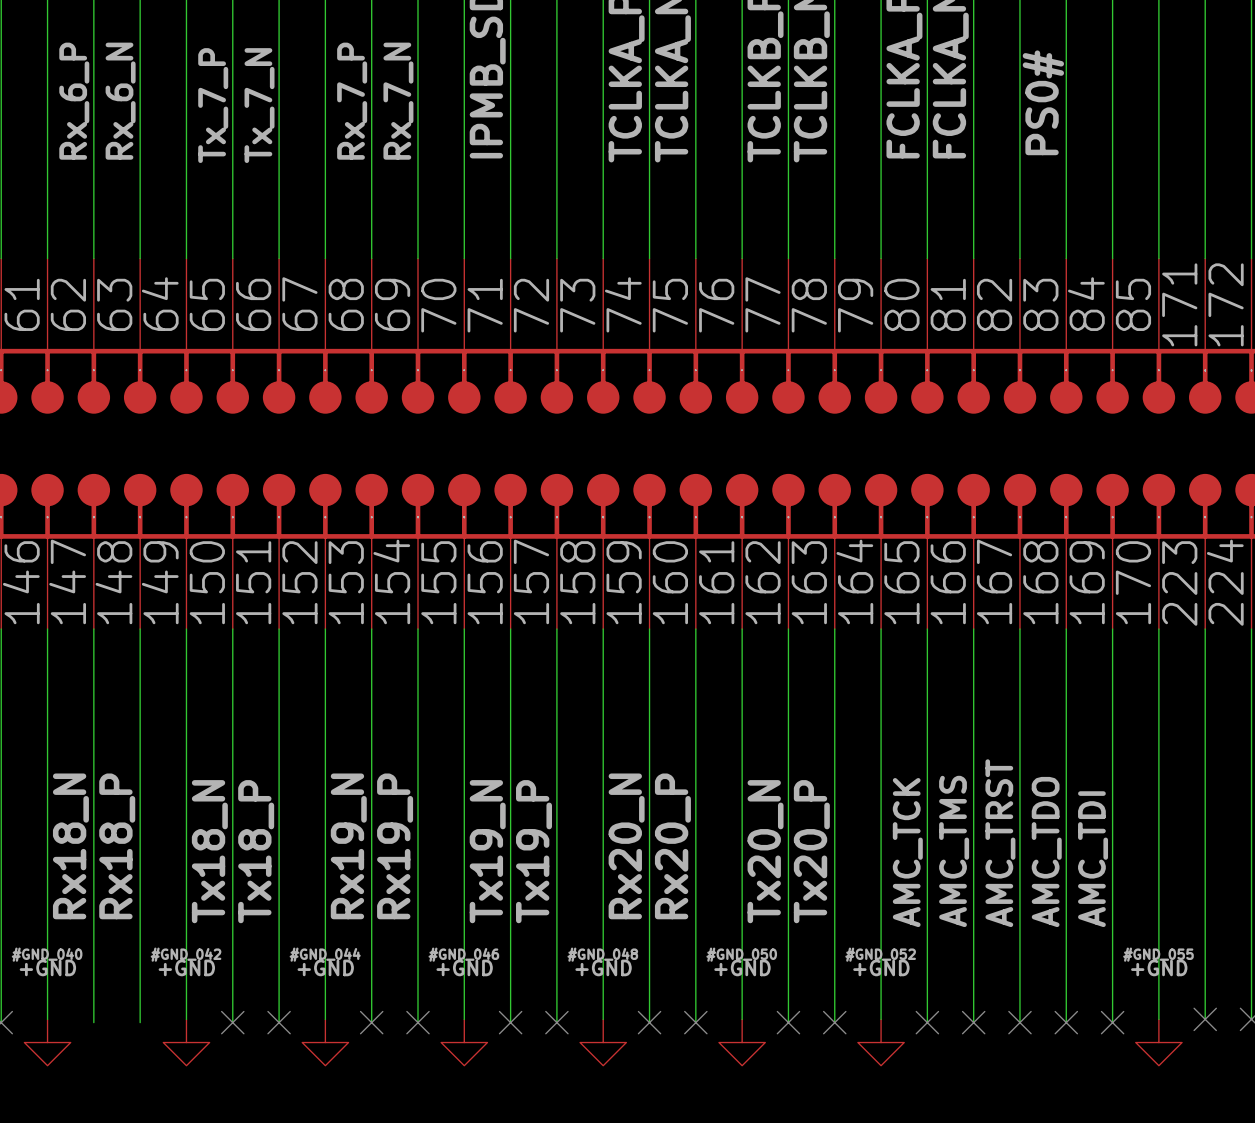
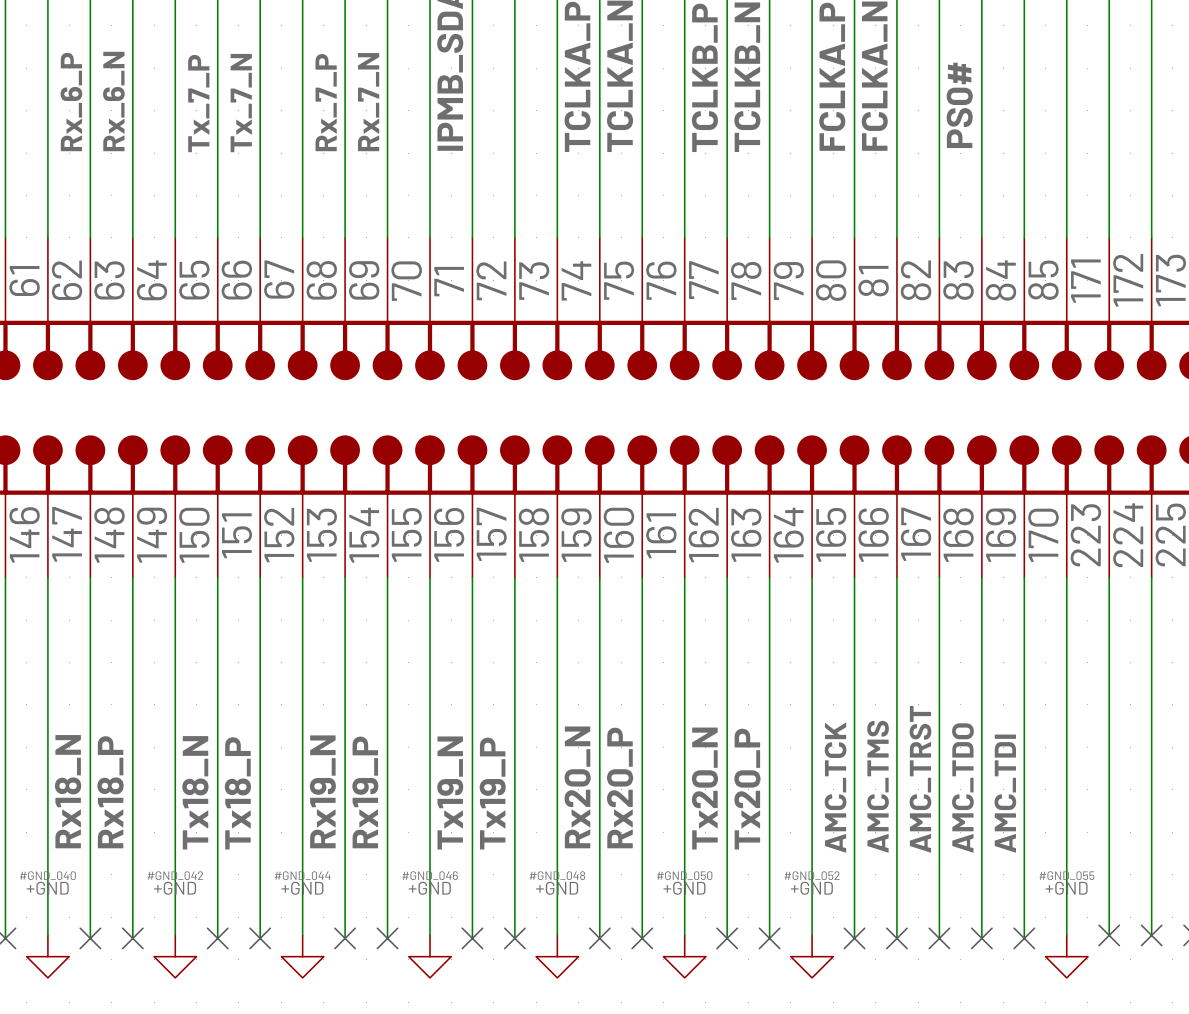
no-connect mark: none -> (90, 938)
no-connect mark: none -> (132, 938)

